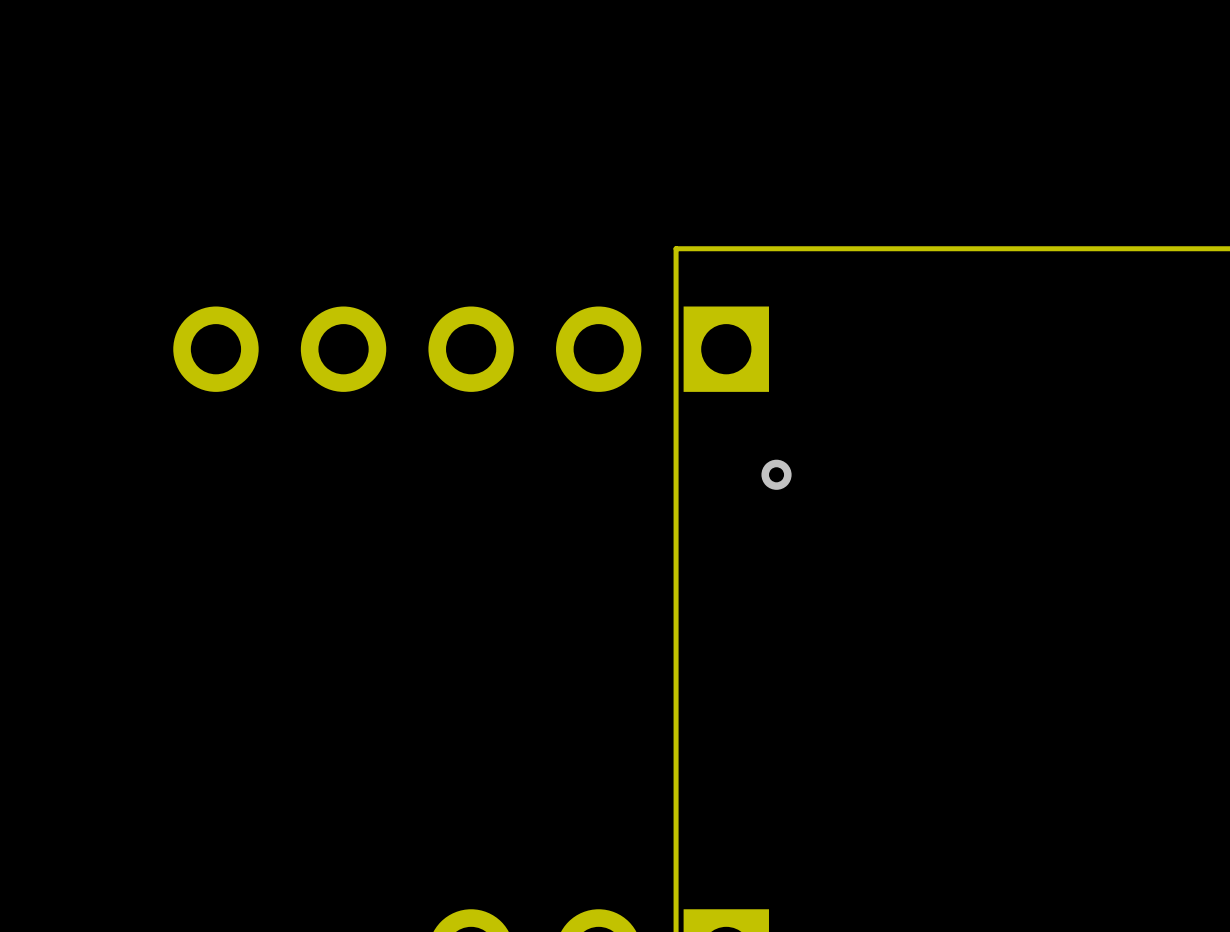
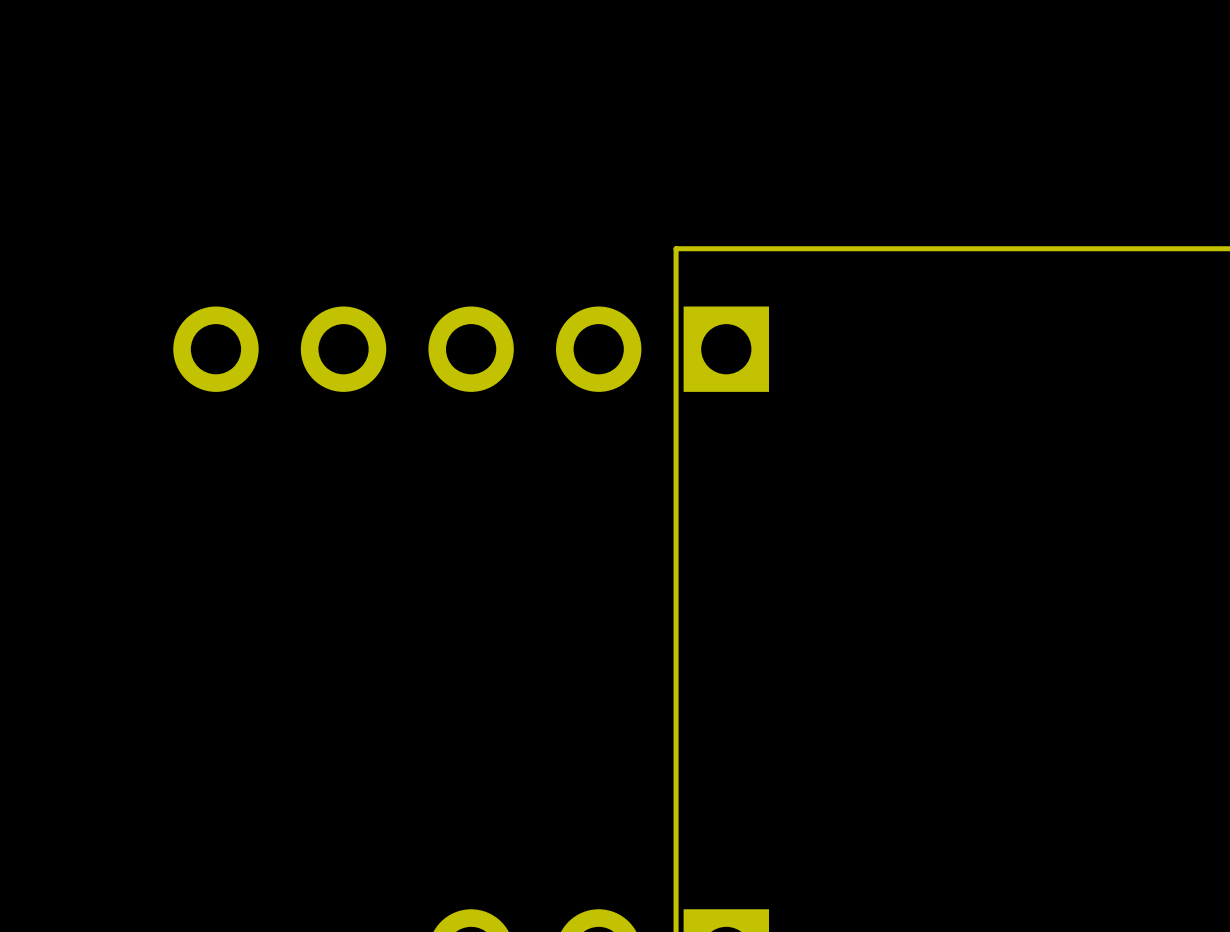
via: (776, 474) -> none

